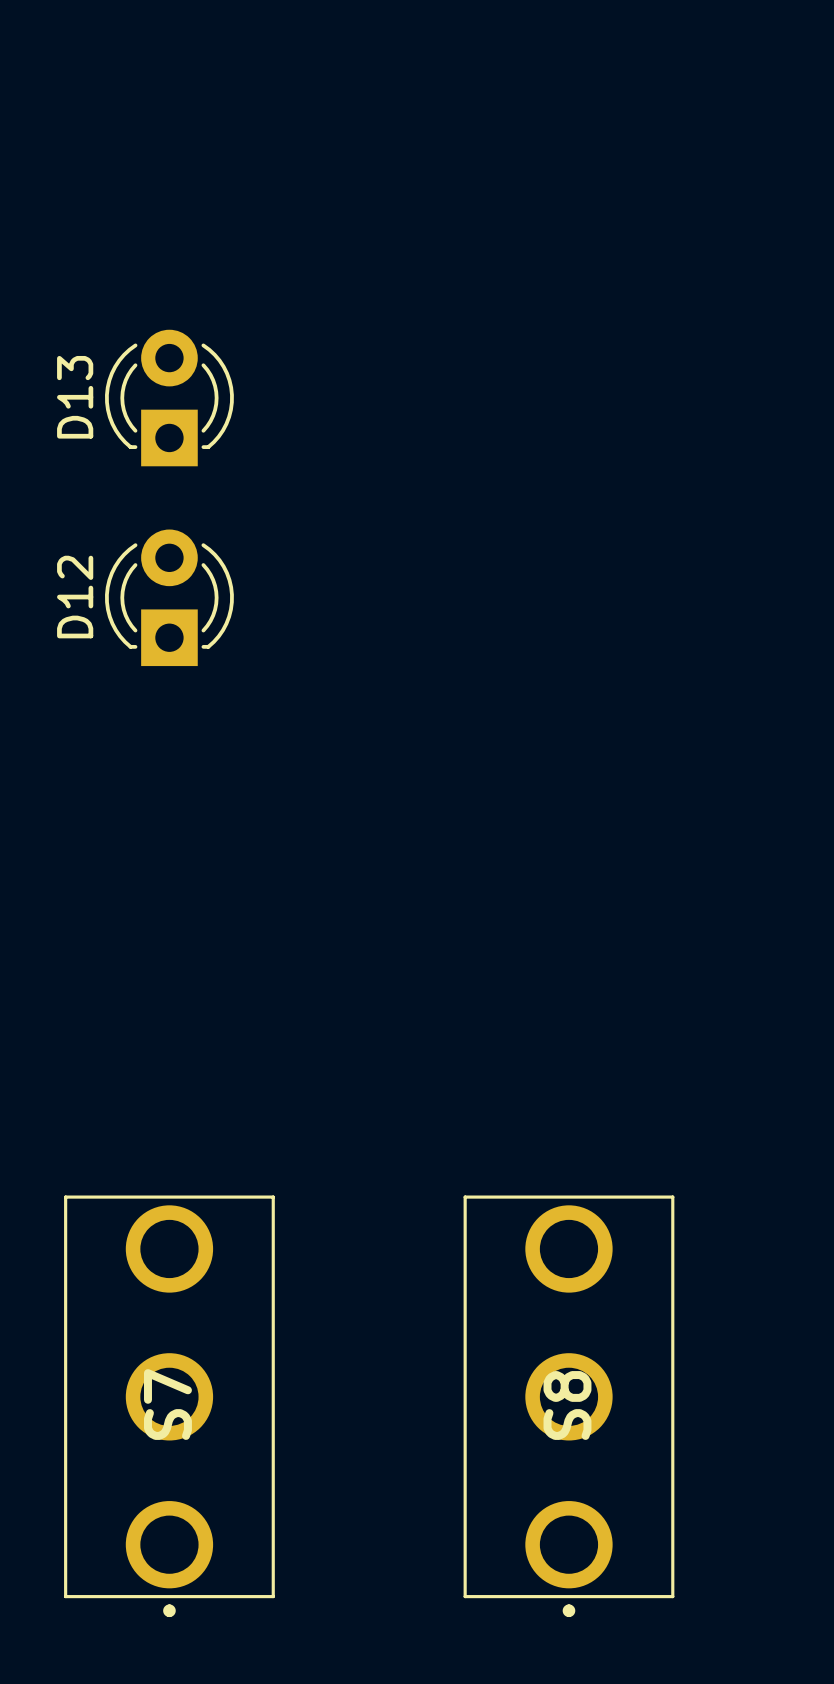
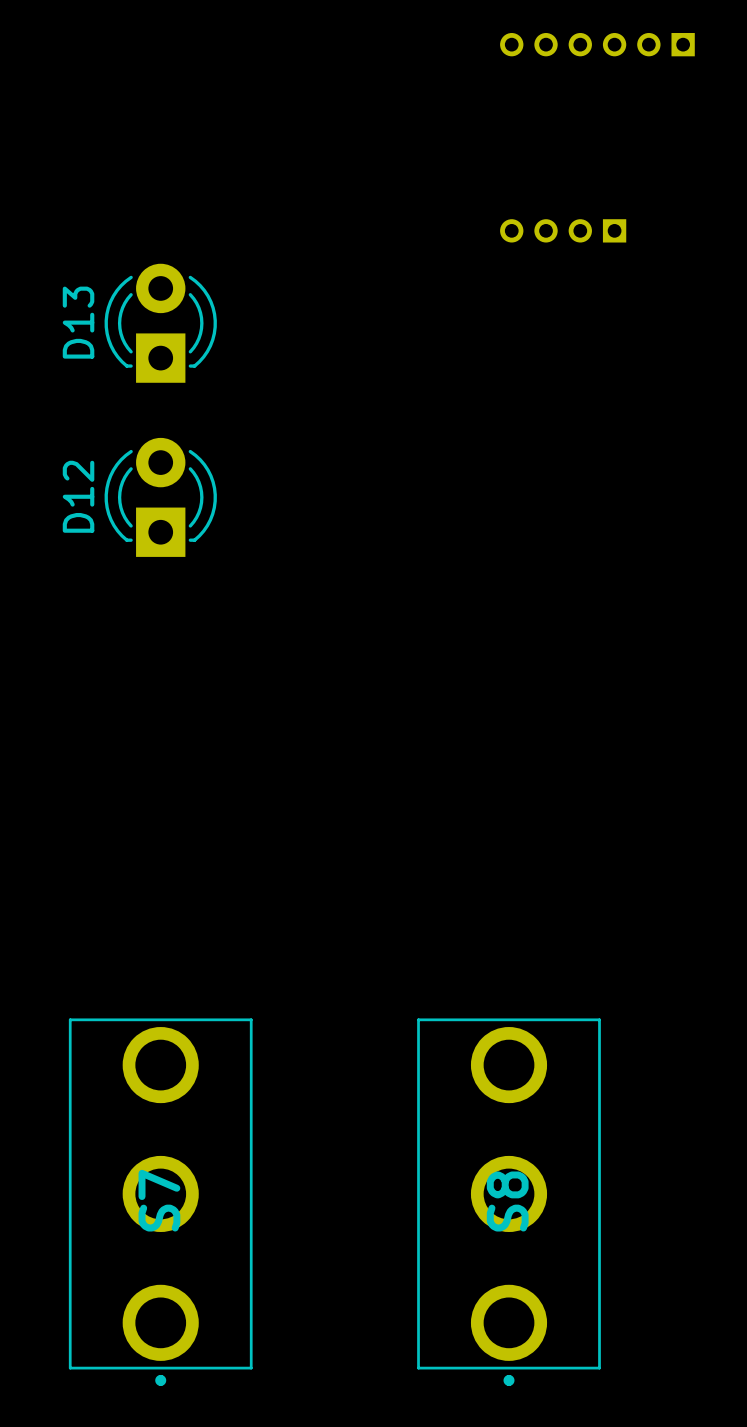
part: none -> (597, 44)
part: none -> (563, 230)

